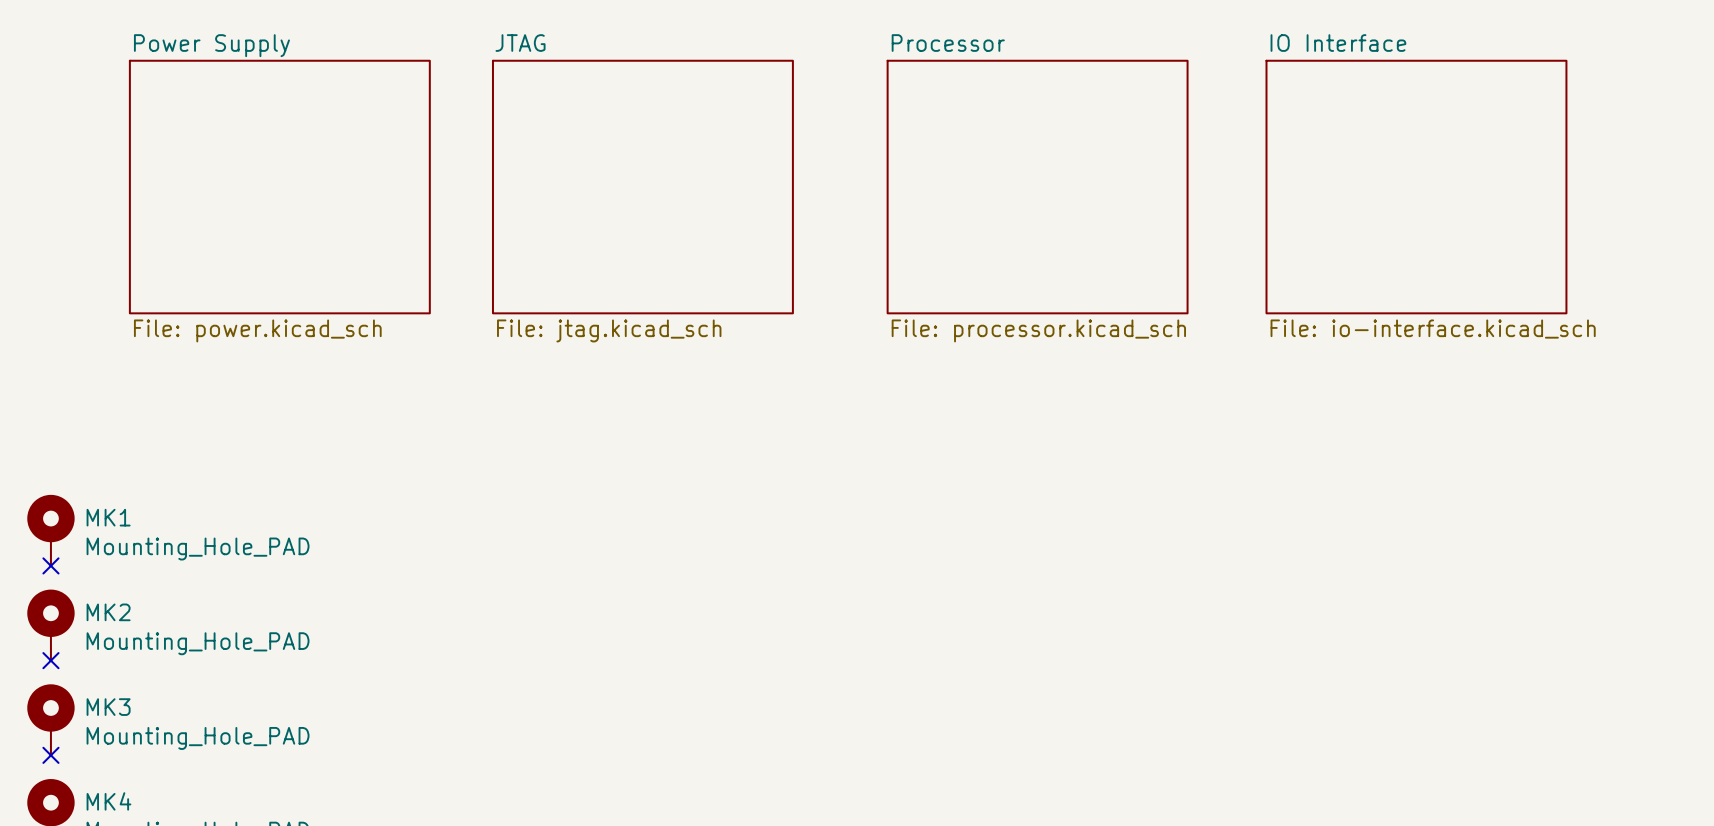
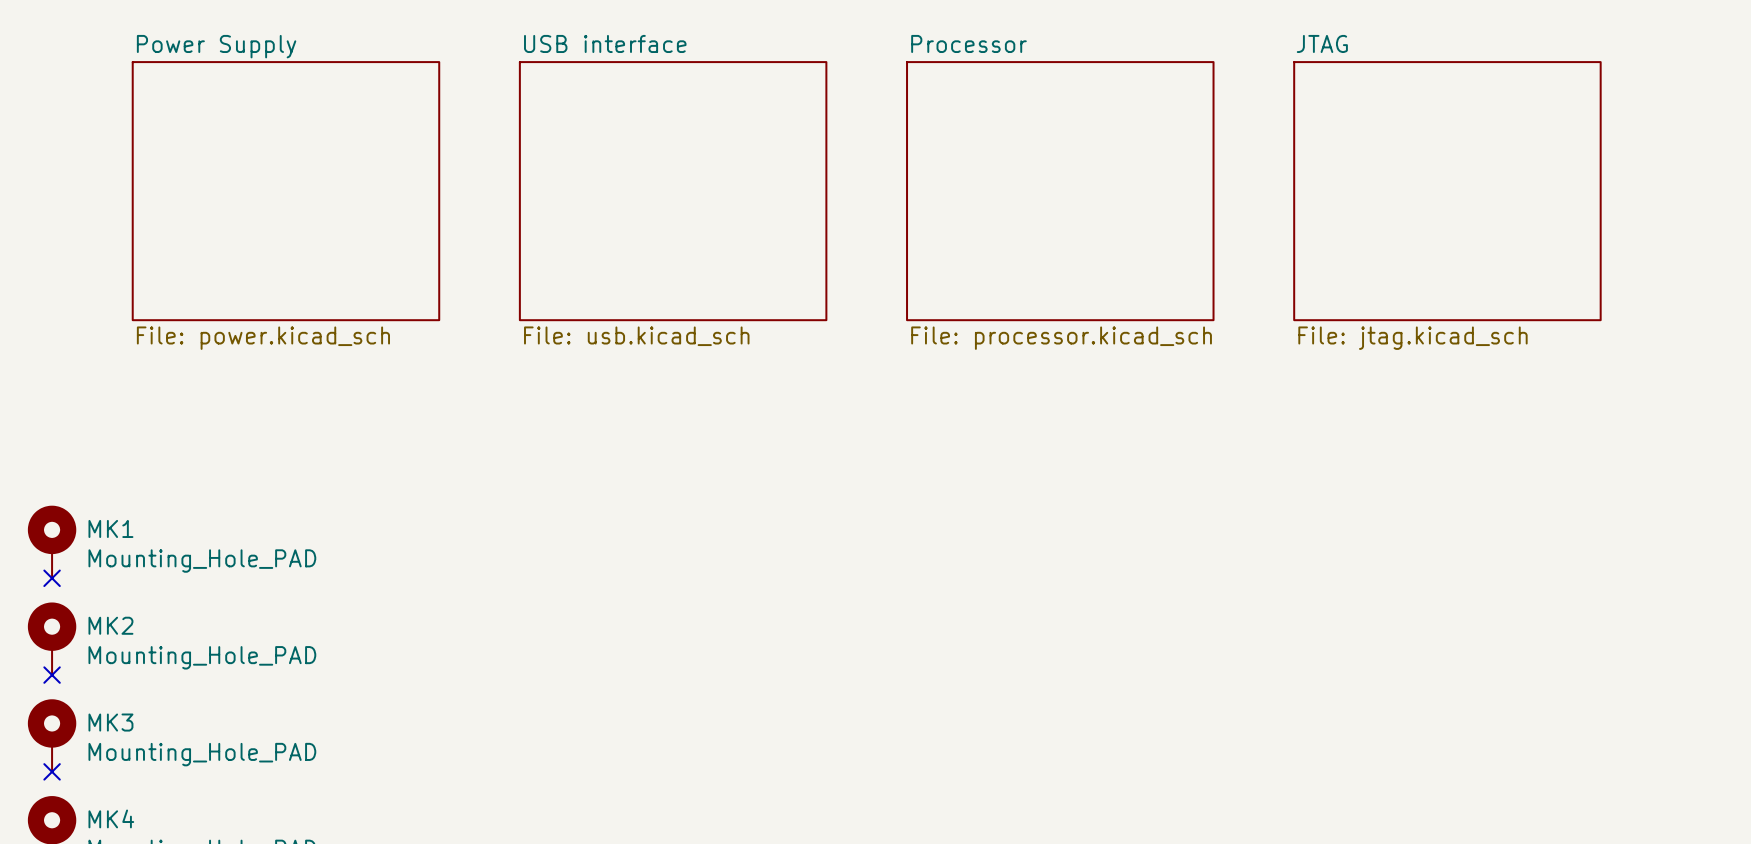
sheet IO Interface name: IO Interface (1338, 43) -> JTAG (1322, 43)
sheet JTAG: File: jtag.kicad_sch (642, 187) -> none
sheet USB interface: none -> File: usb.kicad_sch (673, 191)
sheet IO Interface value: File: io-interface.kicad_sch (1433, 329) -> File: jtag.kicad_sch (1412, 338)

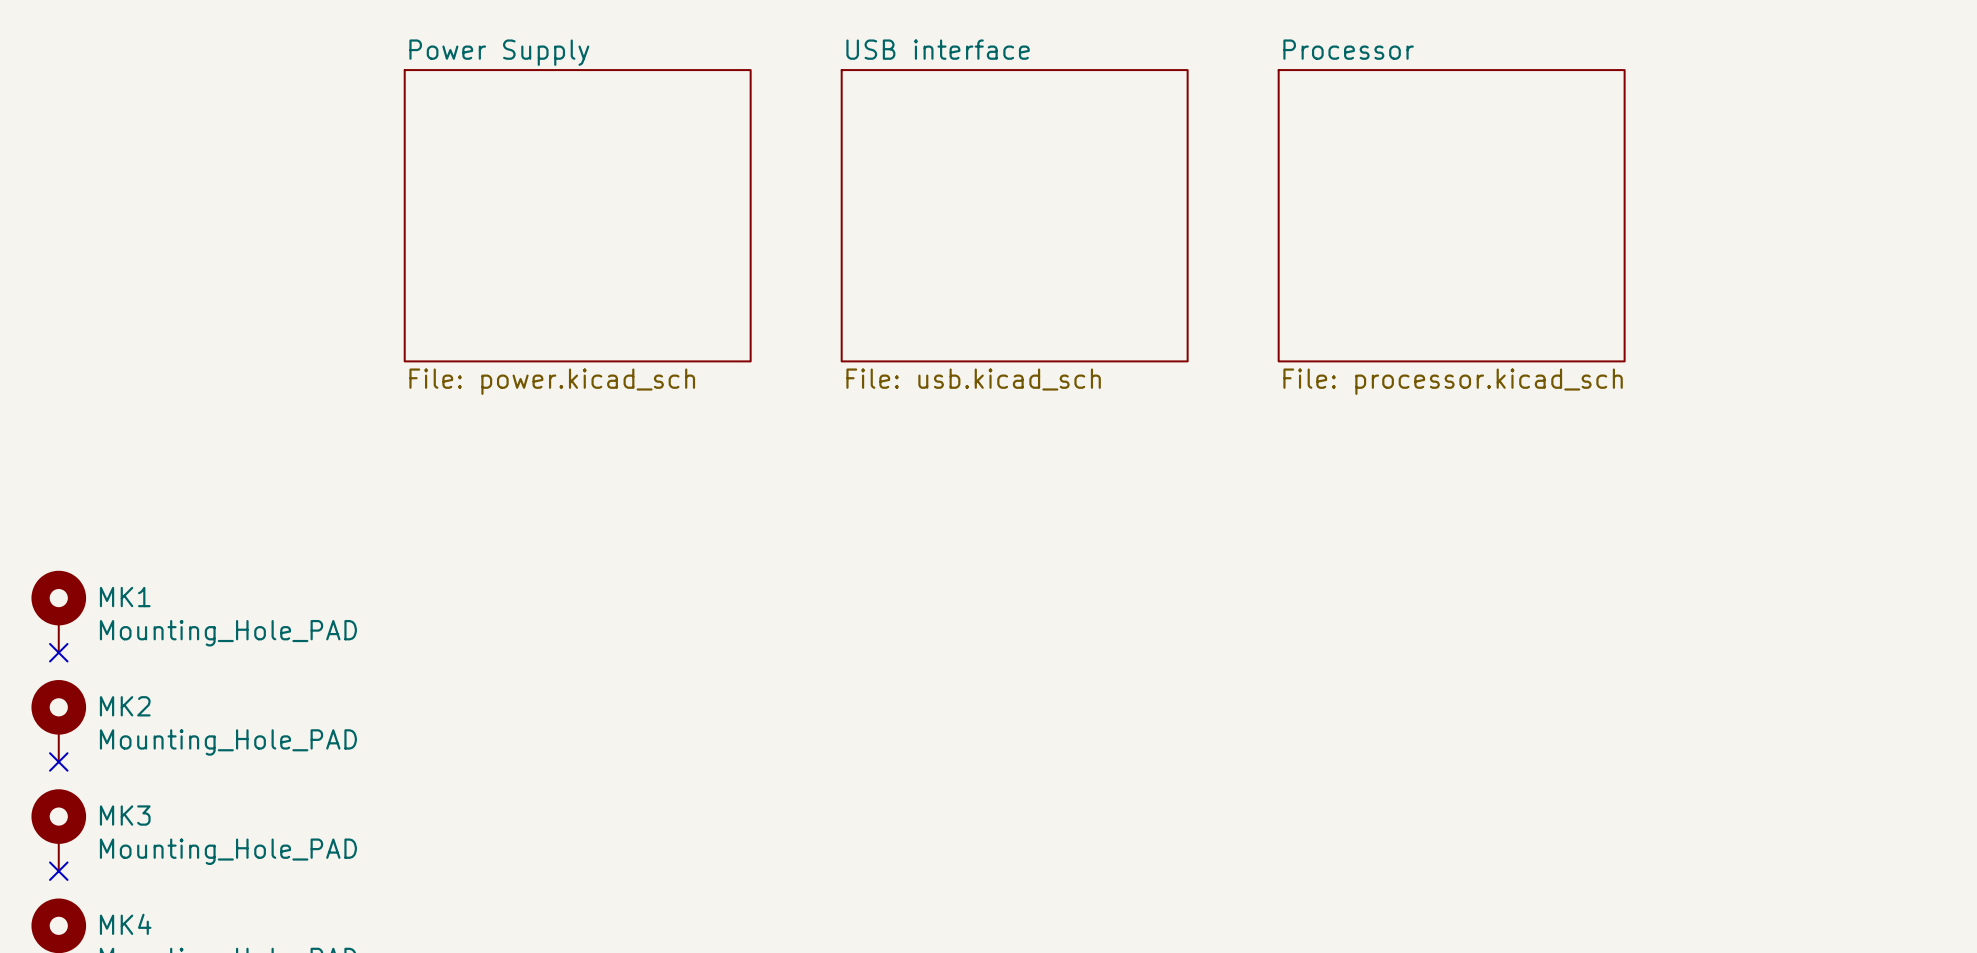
sheet Power Supply position: (285, 191) -> (577, 215)
sheet USB interface position: (673, 191) -> (1014, 215)
sheet Processor position: (1060, 191) -> (1451, 215)
sheet JTAG: File: jtag.kicad_sch (1447, 191) -> none

